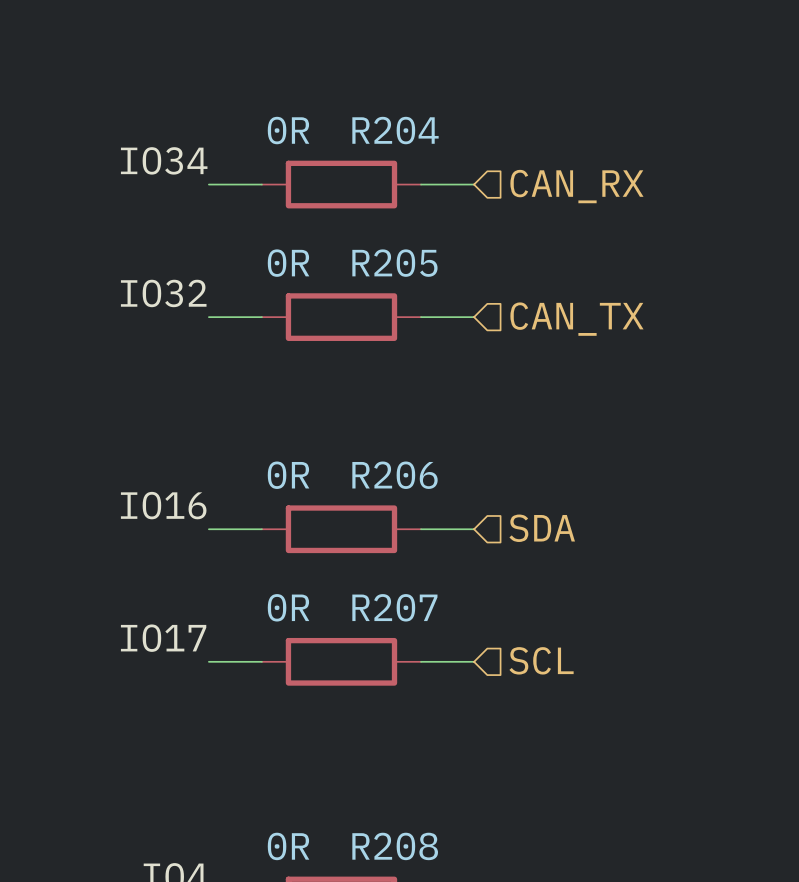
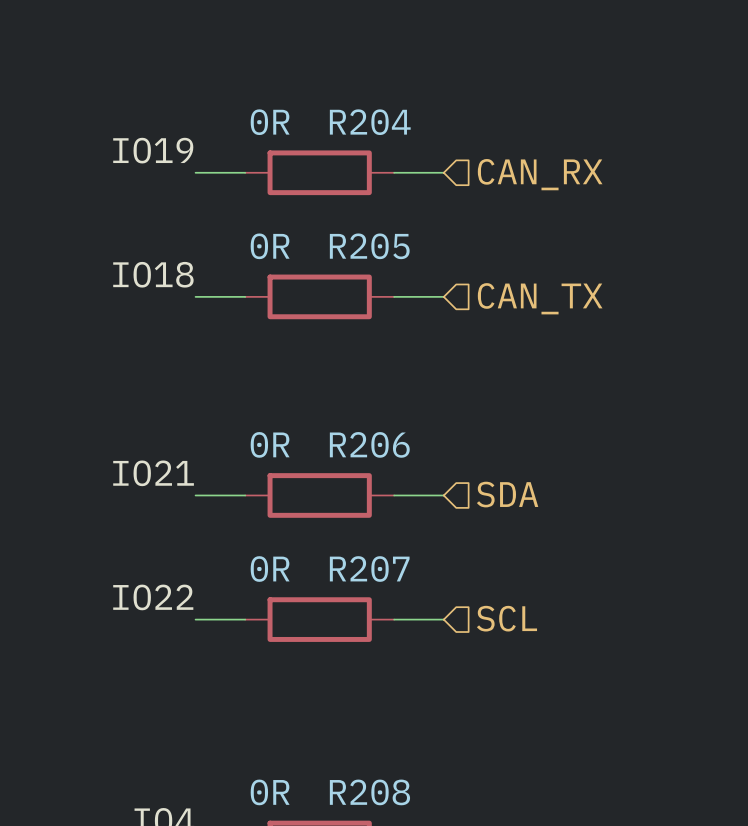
label: IO34 (164, 160) -> IO19 (153, 150)
label: IO32 (163, 293) -> IO18 (153, 274)
label: IO16 (163, 505) -> IO21 (153, 473)
label: IO17 (163, 638) -> IO22 (153, 597)

